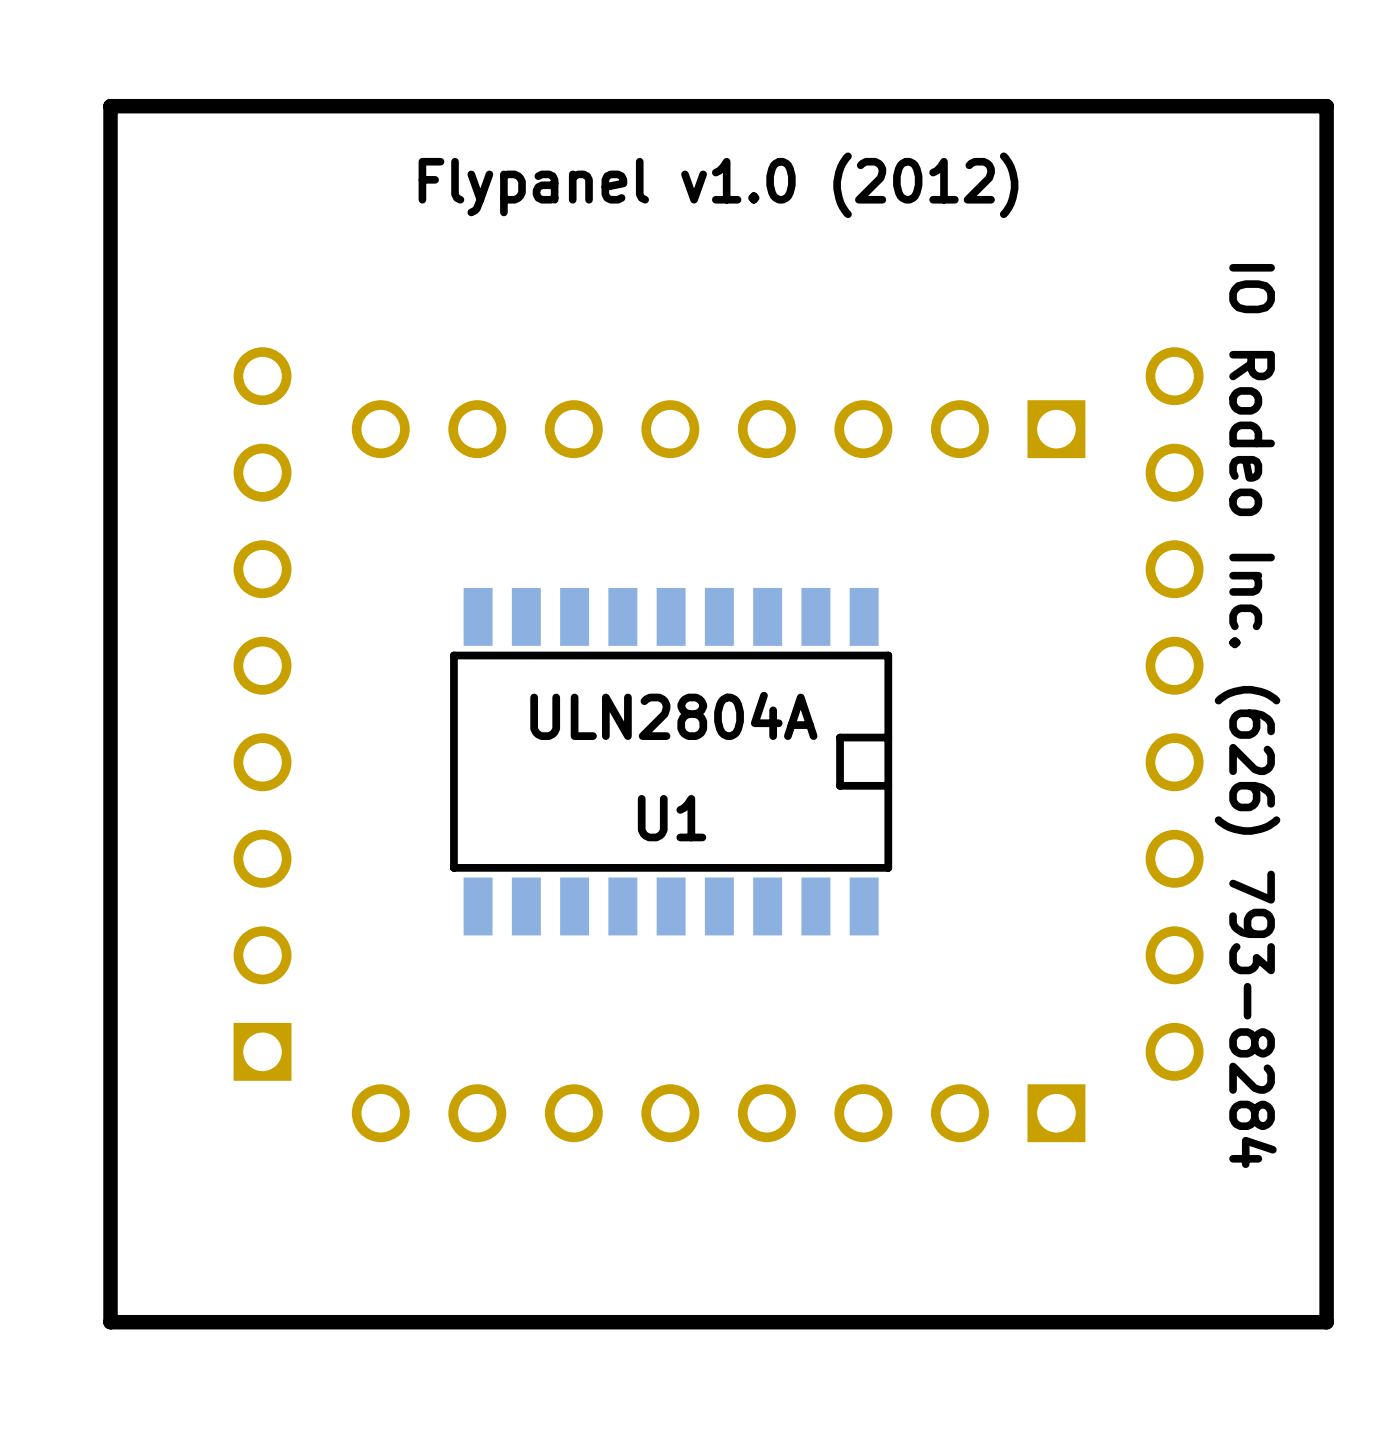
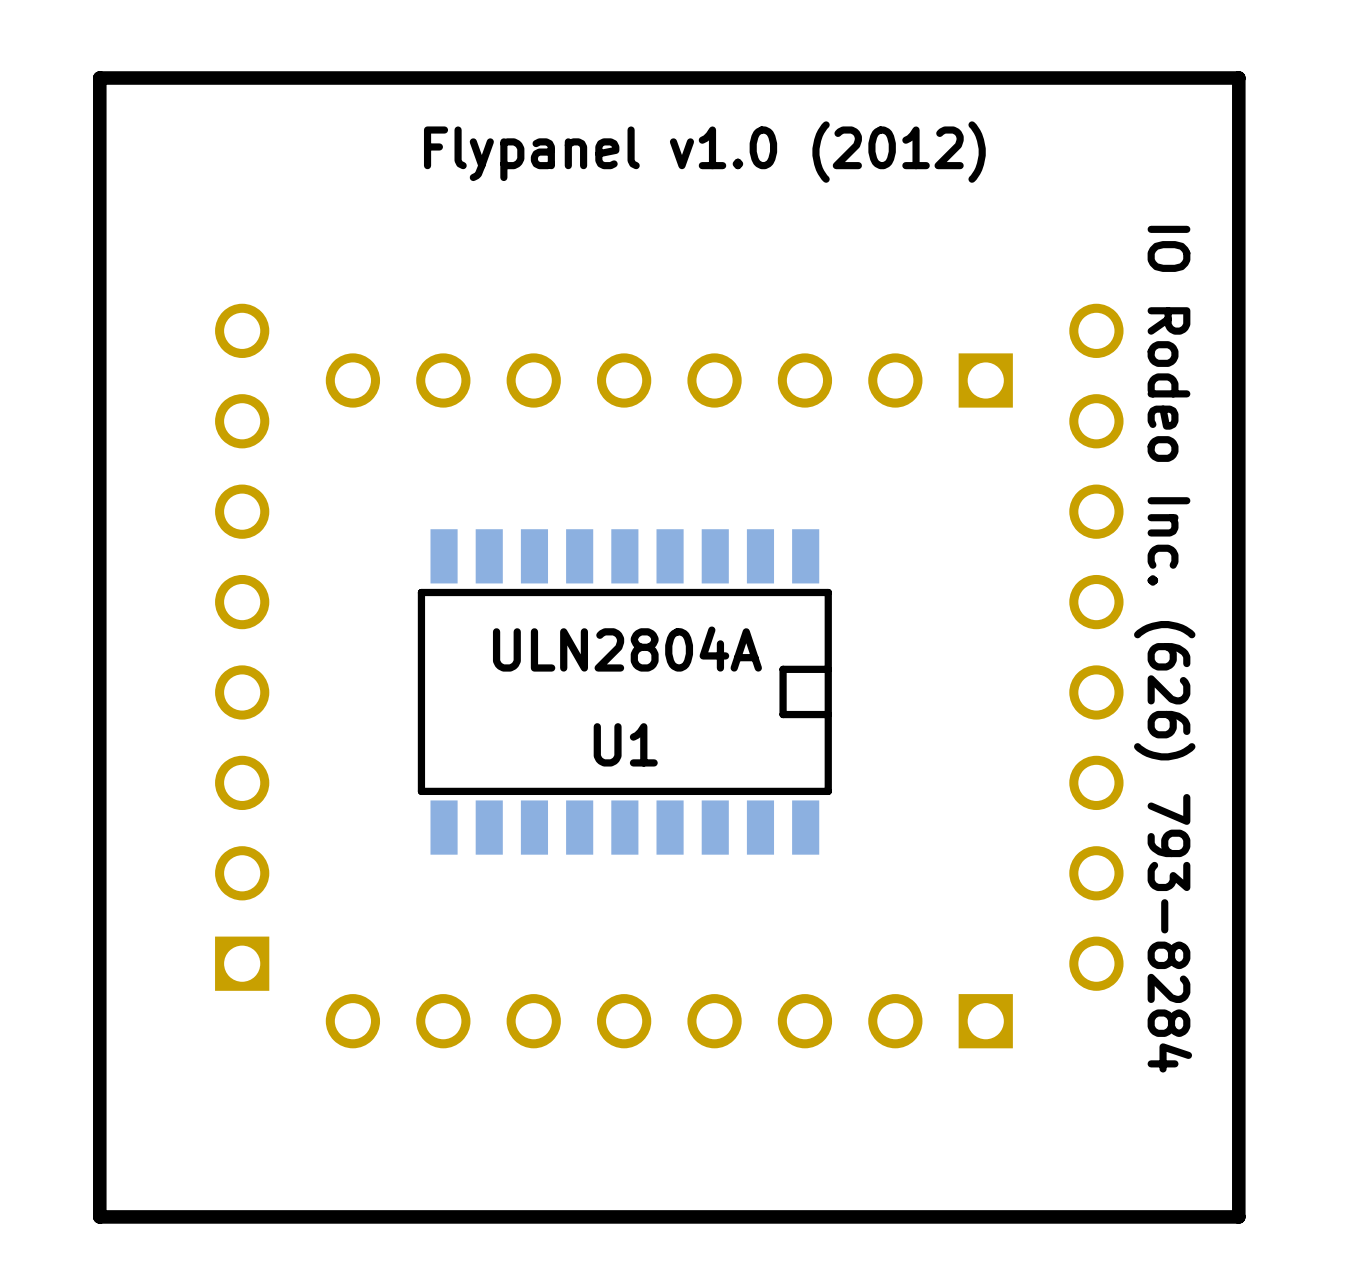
text position: Flypanel v1.0 (2012) (718, 185) -> Flypanel v1.0 (2012) (704, 152)

